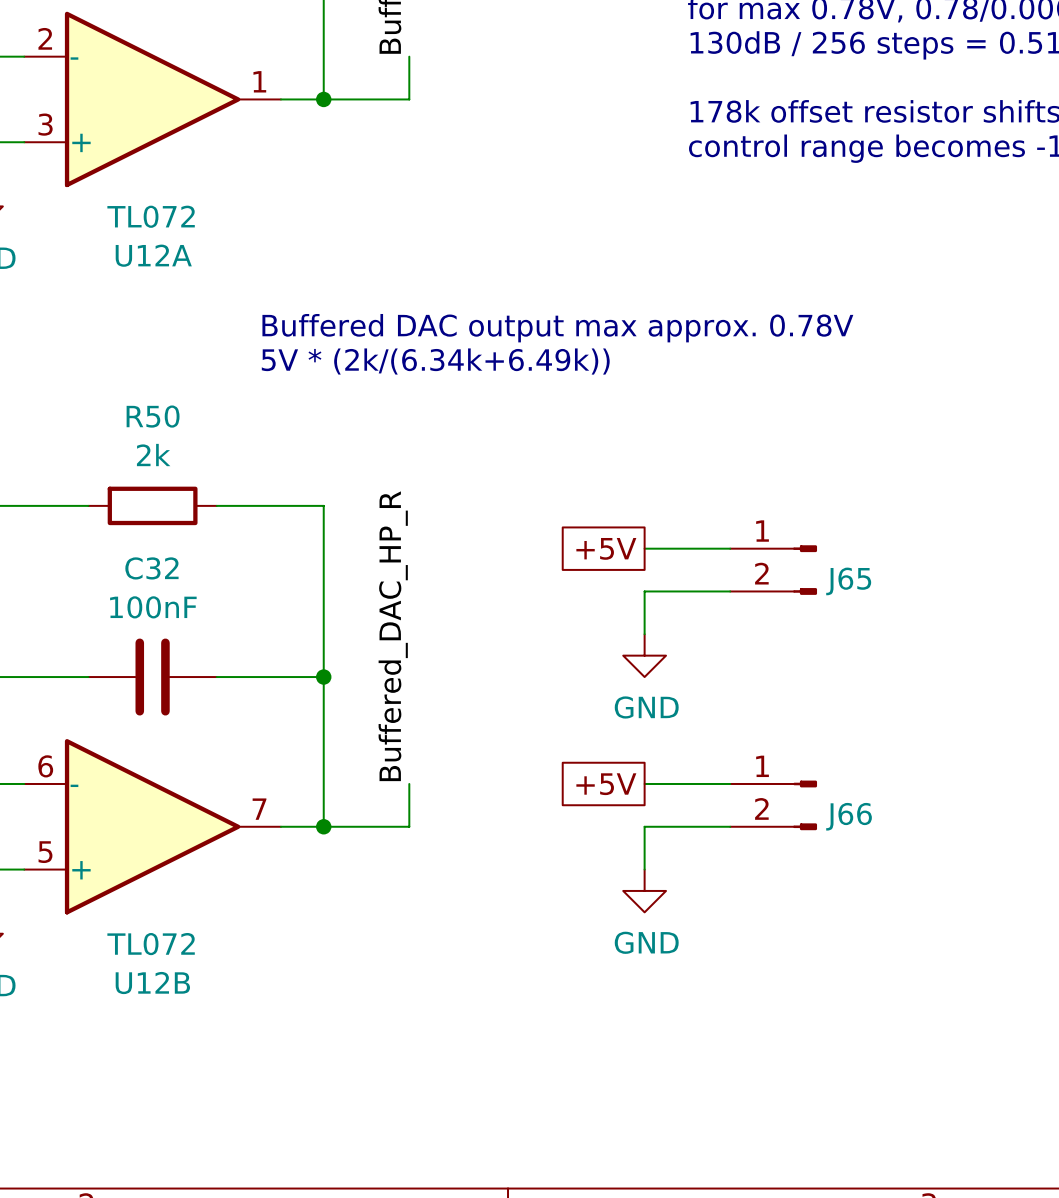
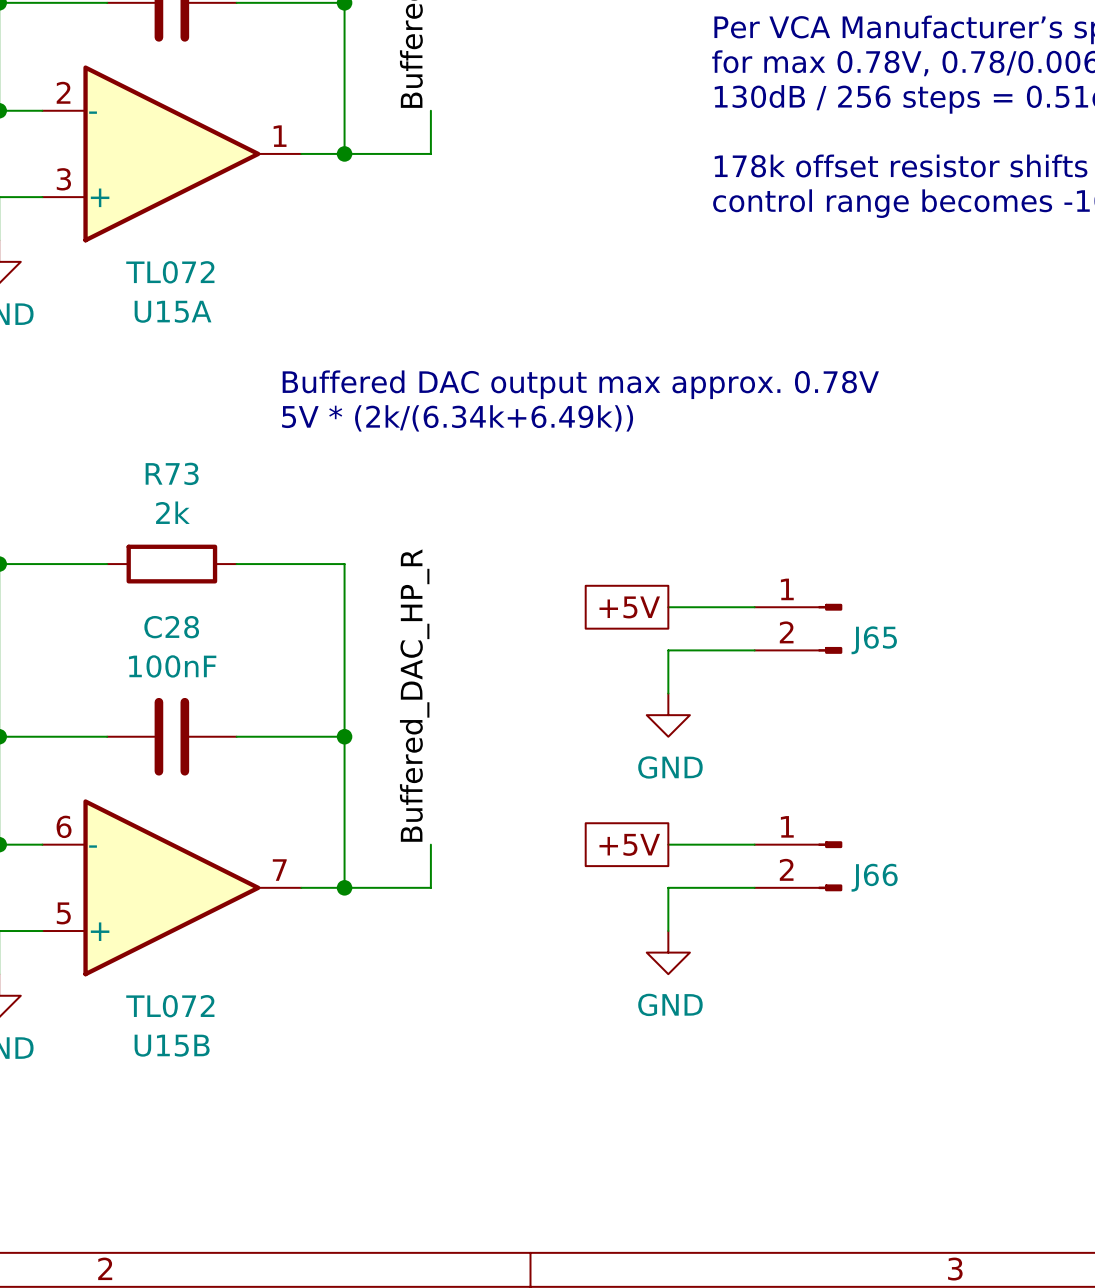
U12A name: U12A (153, 255) -> U15A (173, 311)
R50 name: R50 (153, 416) -> R73 (172, 473)
C32 name: C32 (151, 568) -> C28 (171, 627)
U12B name: U12B (152, 983) -> U15B (172, 1045)

